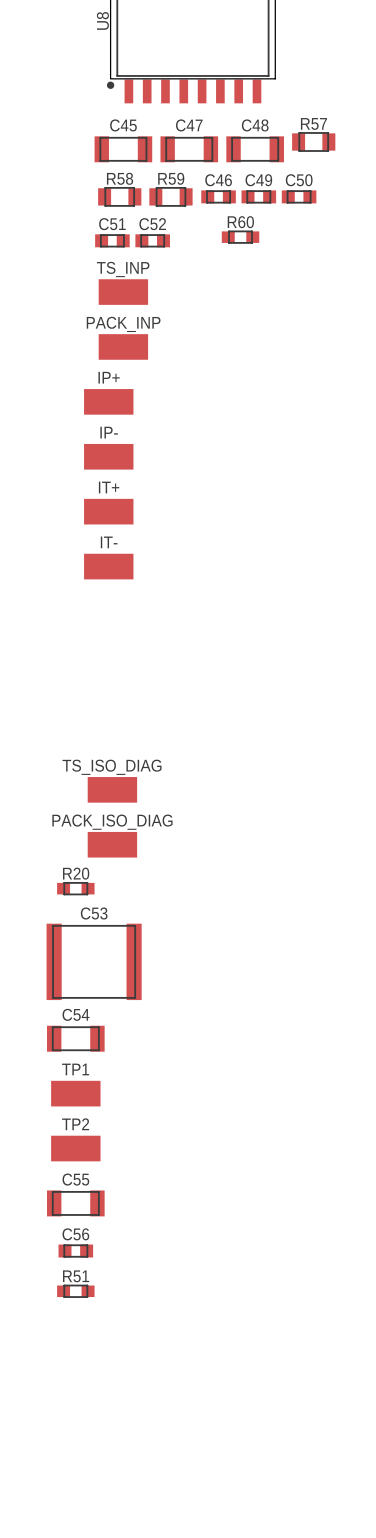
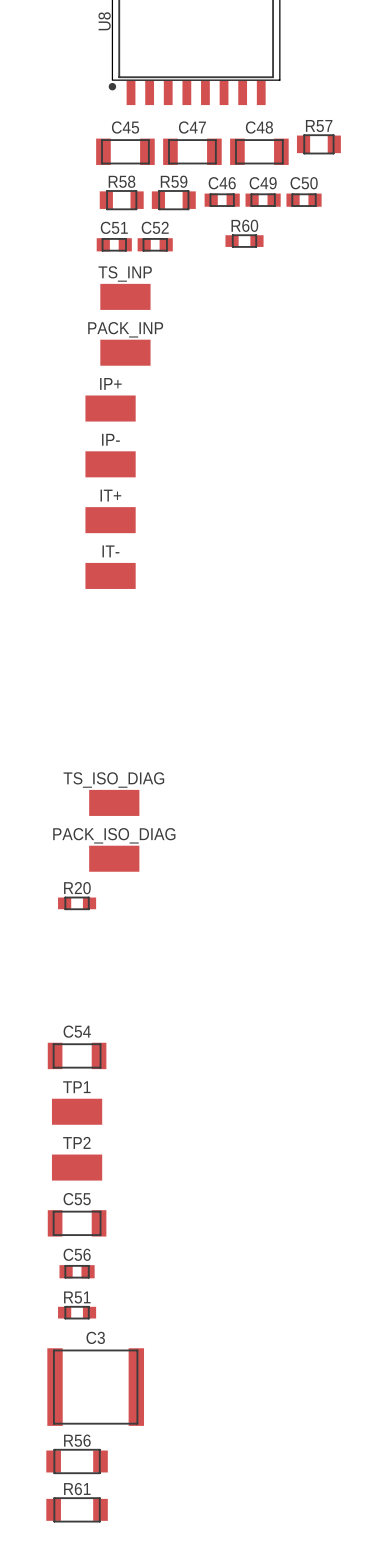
C53: (94, 961) -> none
C3: none -> (95, 1387)
R56: none -> (77, 1461)
R61: none -> (77, 1509)

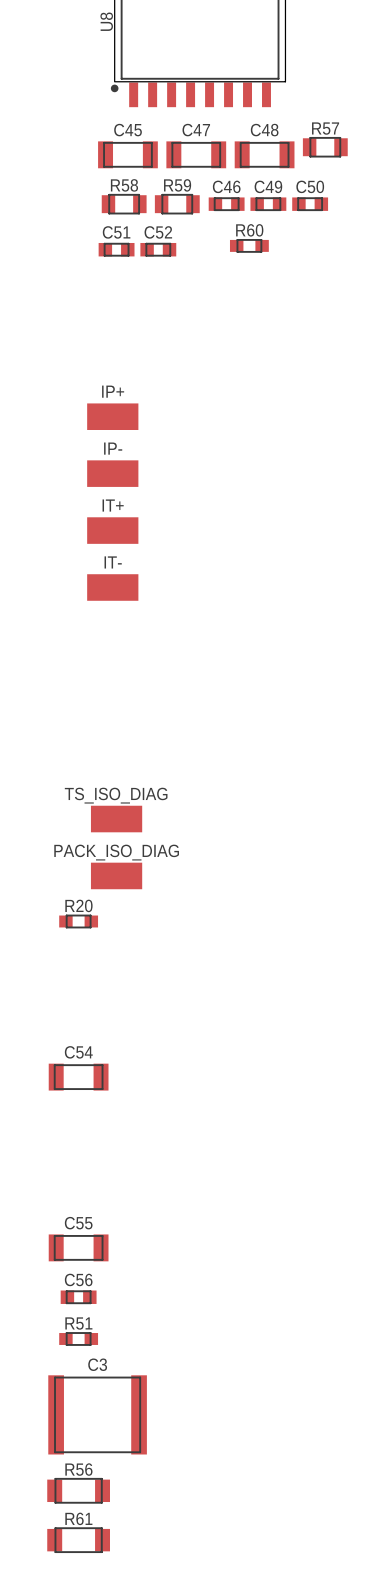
TS_INP: (125, 296) -> none
PACK_INP: (125, 352) -> none
TP1: (77, 1111) -> none
TP2: (77, 1167) -> none

